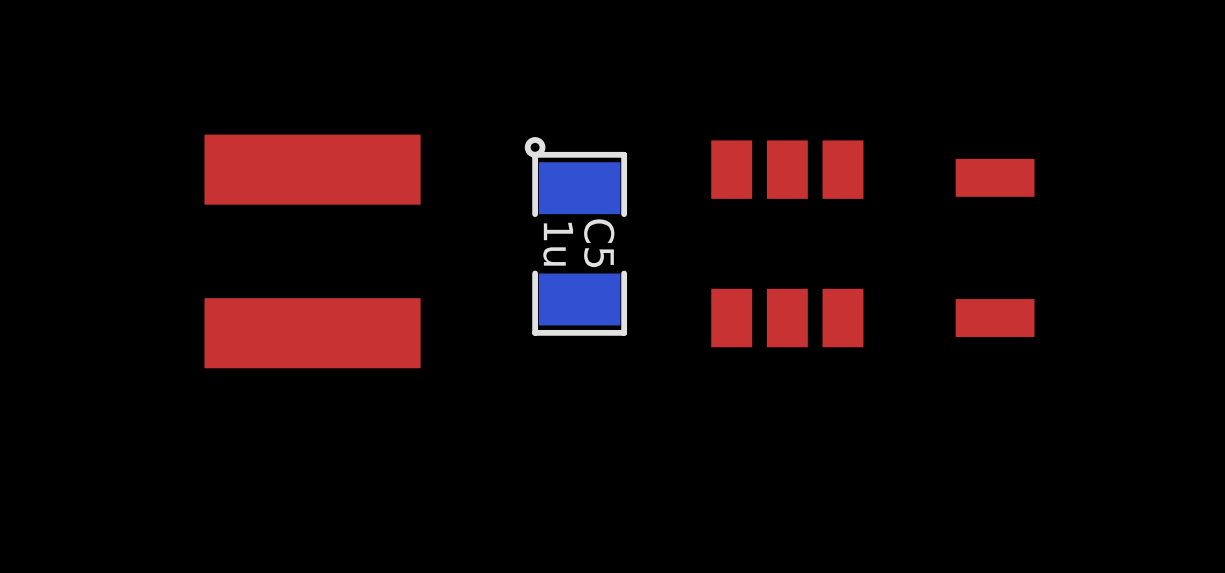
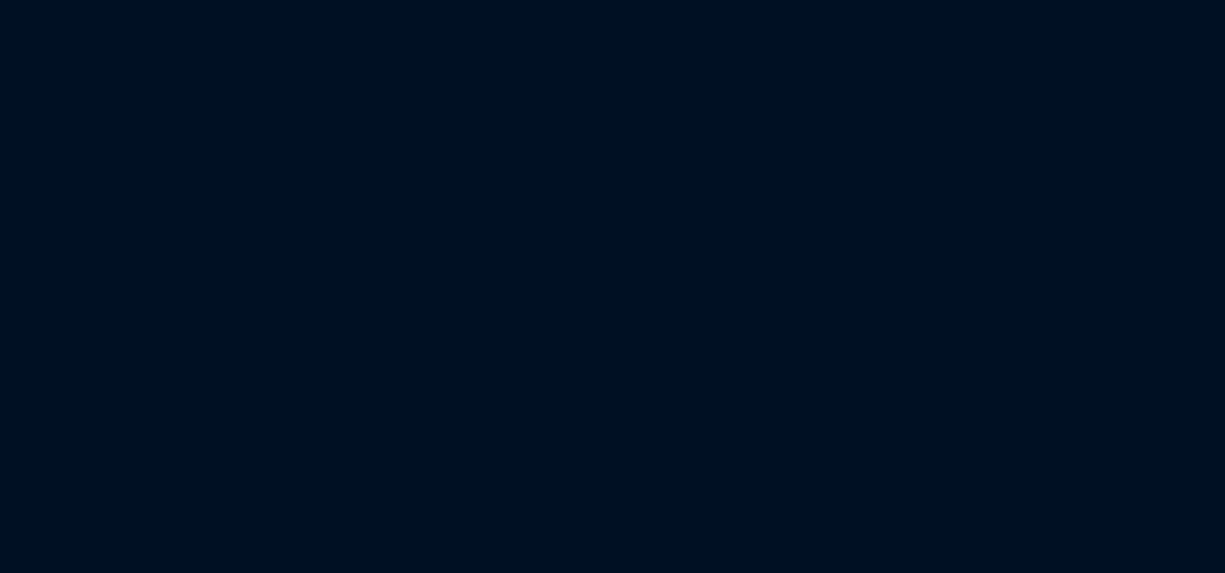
C5: 1u (575, 236) -> none
part: (787, 243) -> none
part: (995, 247) -> none
part: (312, 251) -> none

